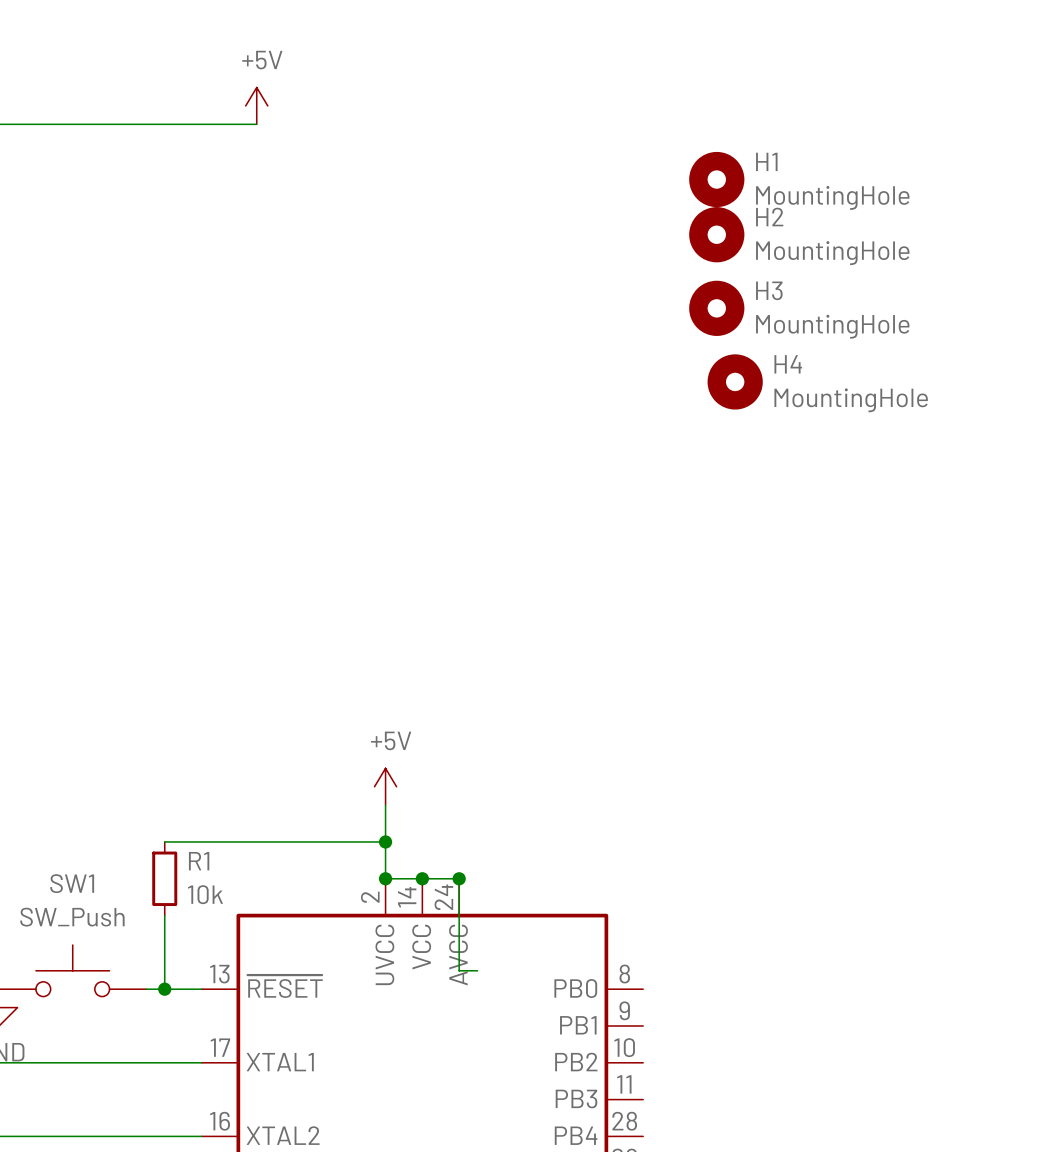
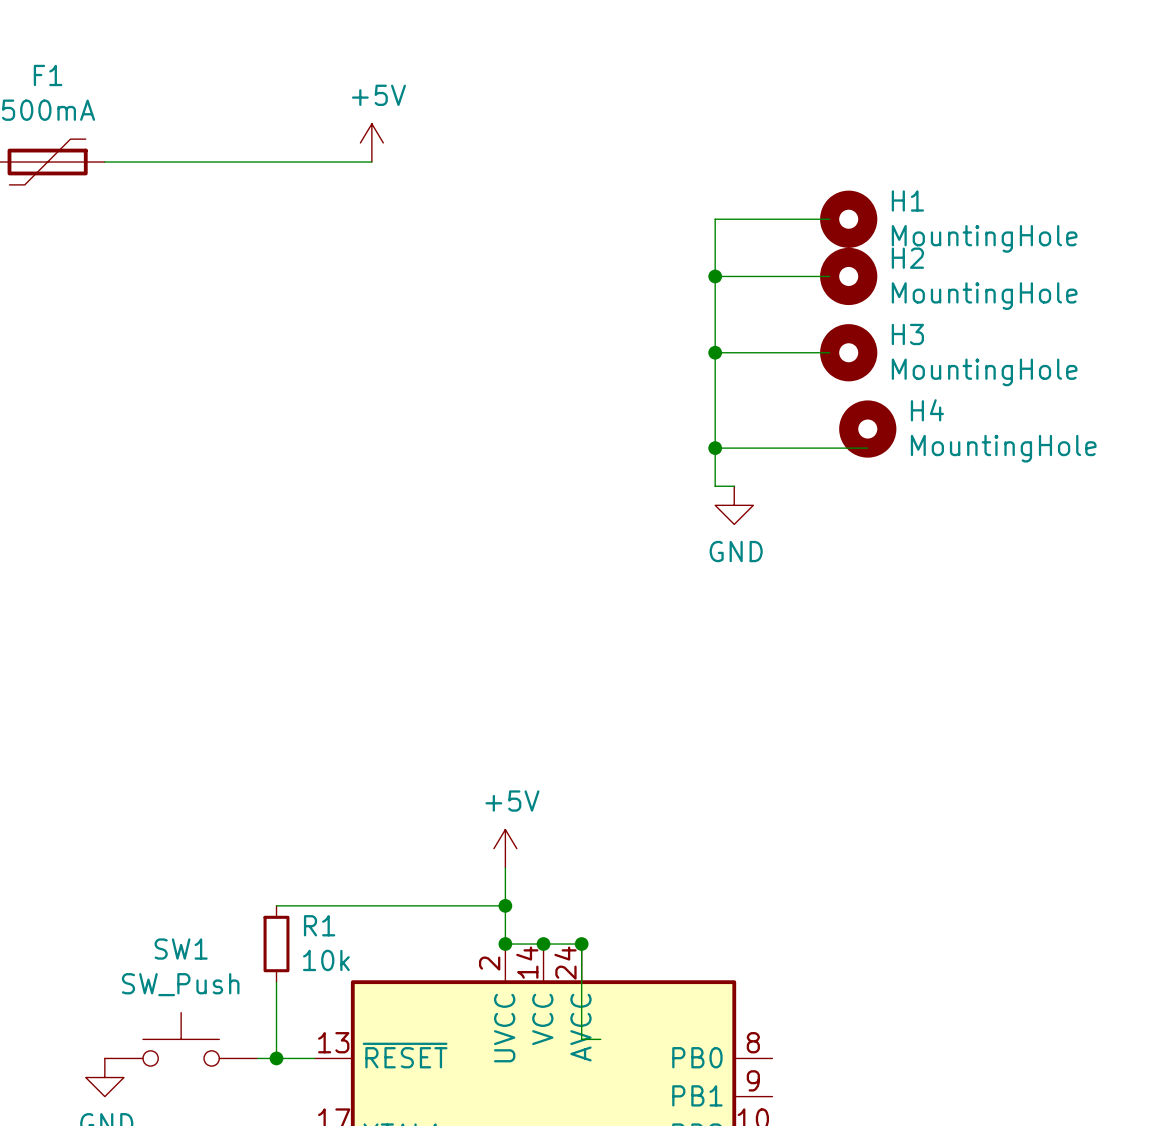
wire: none -> (829, 219) (715, 219) (715, 486) (734, 486)
wire: none -> (715, 276) (829, 276)
junction: none -> (715, 276)
wire: none -> (715, 352) (829, 352)
junction: none -> (715, 352)
wire: none -> (715, 448) (867, 448)
junction: none -> (715, 448)
power symbol: none -> GND (734, 505)

